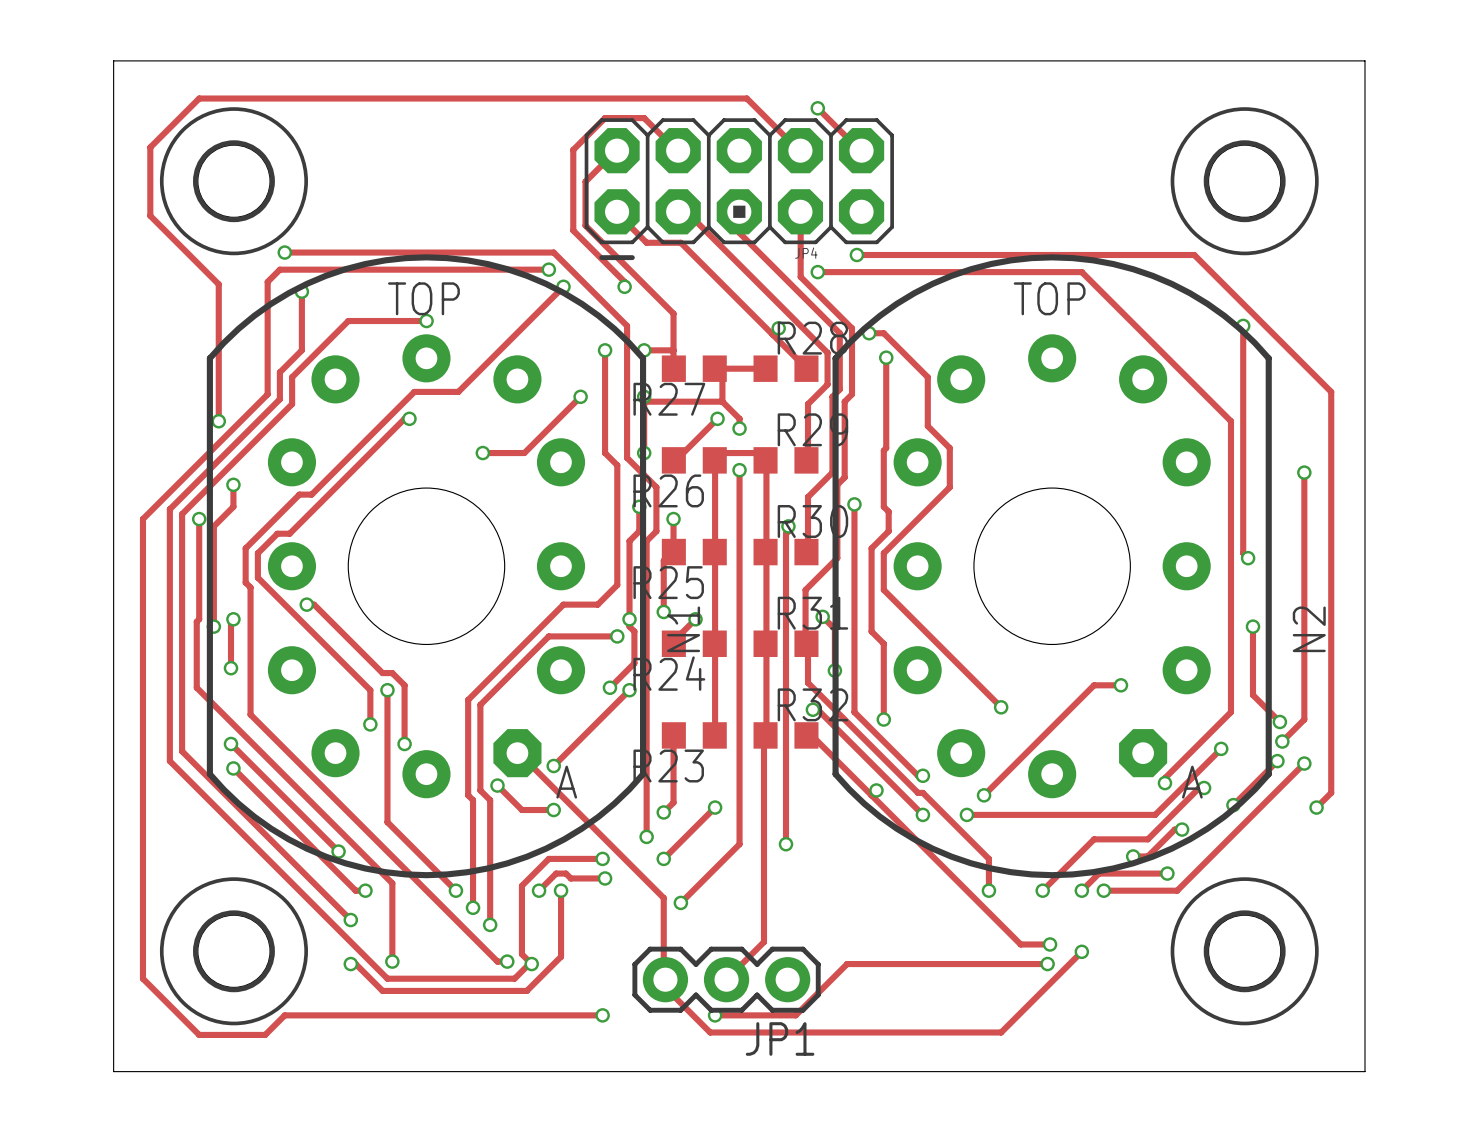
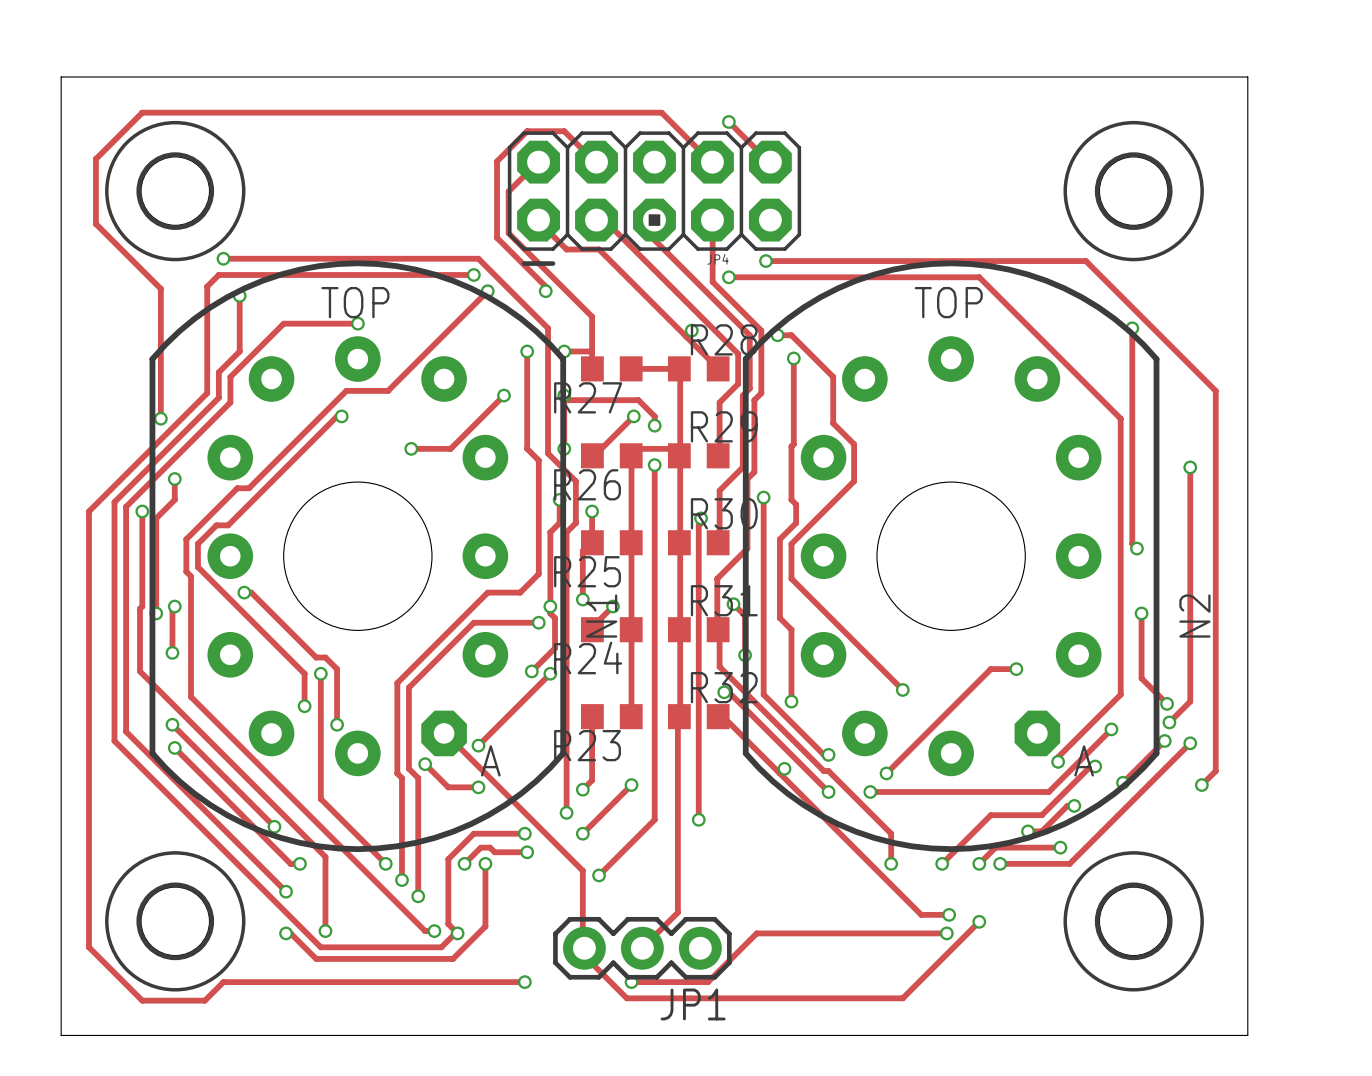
track: (722, 368) (722, 401) -> none
track: none -> (679, 368) (680, 455)

